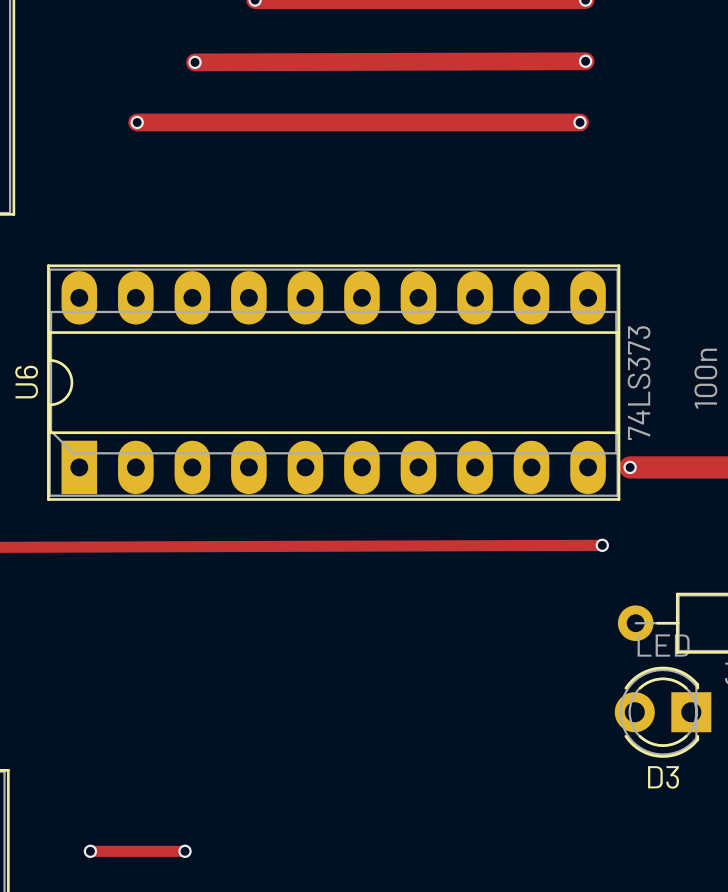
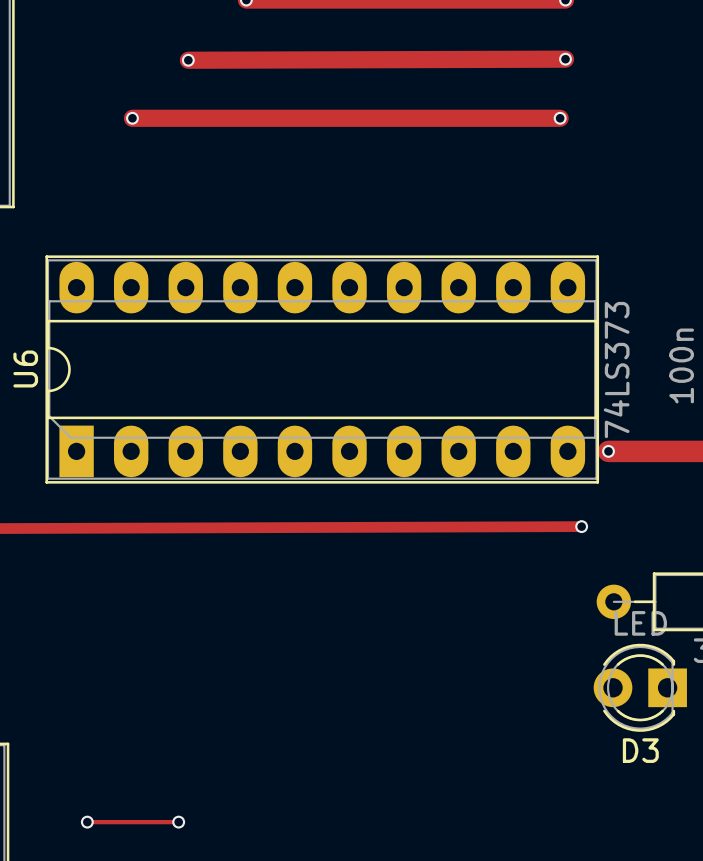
track width: thick (90, 851) (185, 851) -> thin (87, 822) (178, 822)

